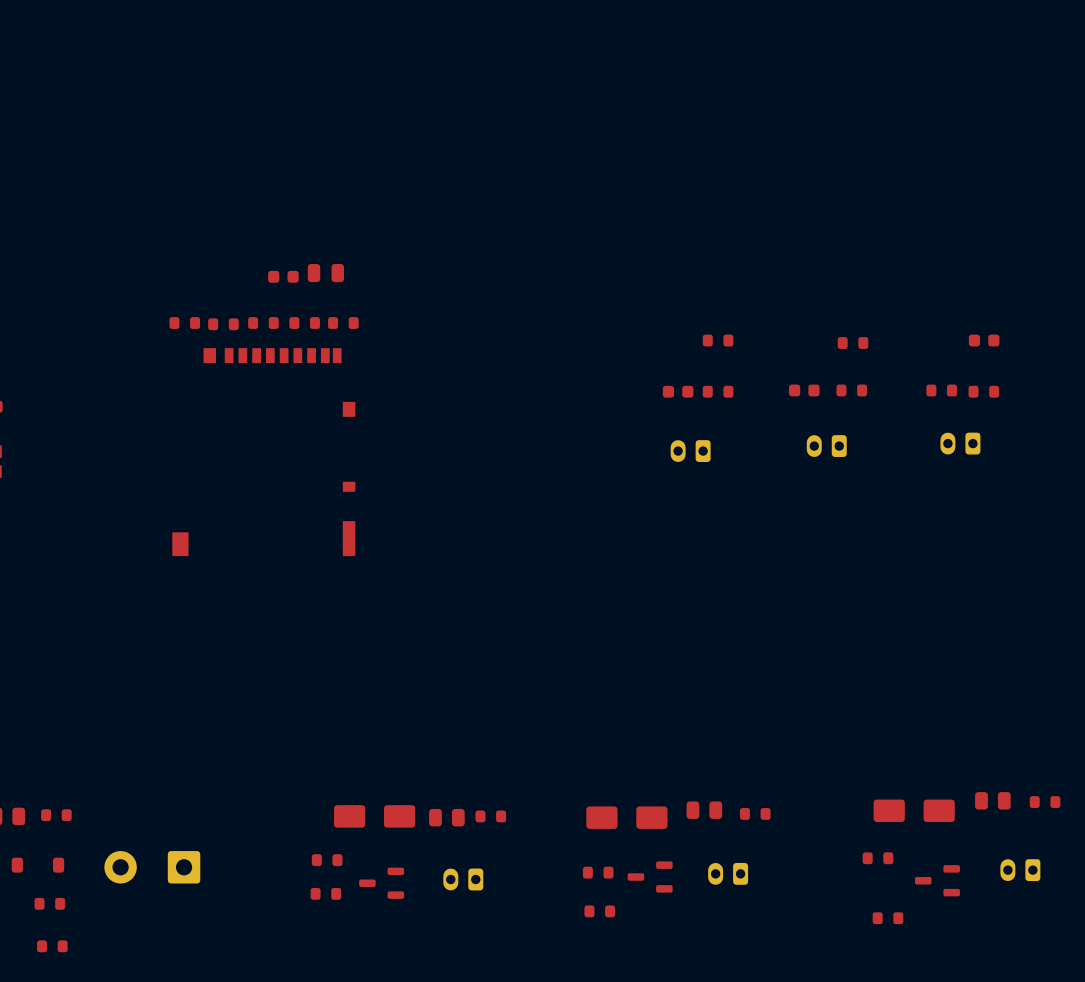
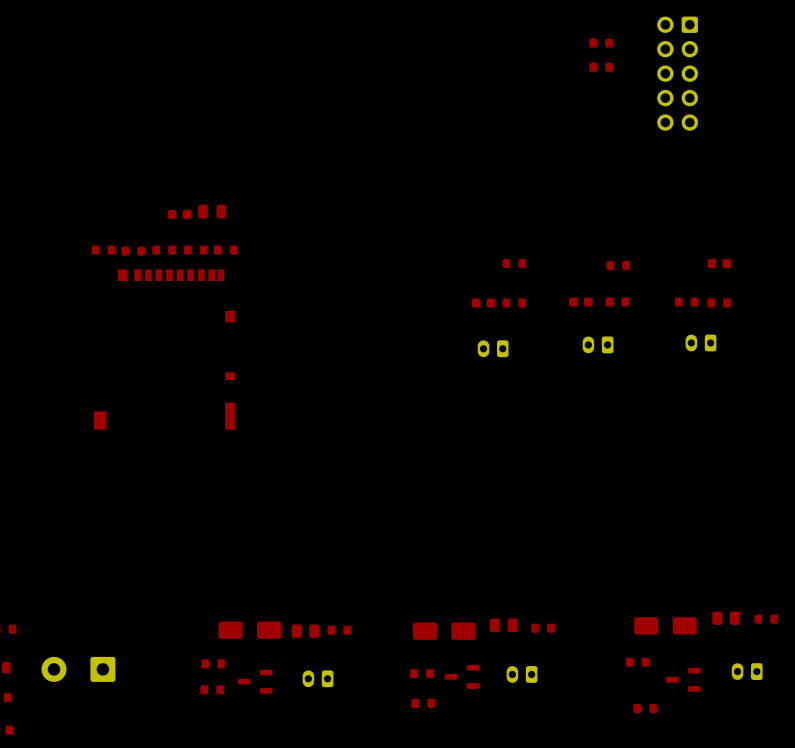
part: none -> (601, 43)
part: none -> (601, 67)
part: none -> (677, 73)

